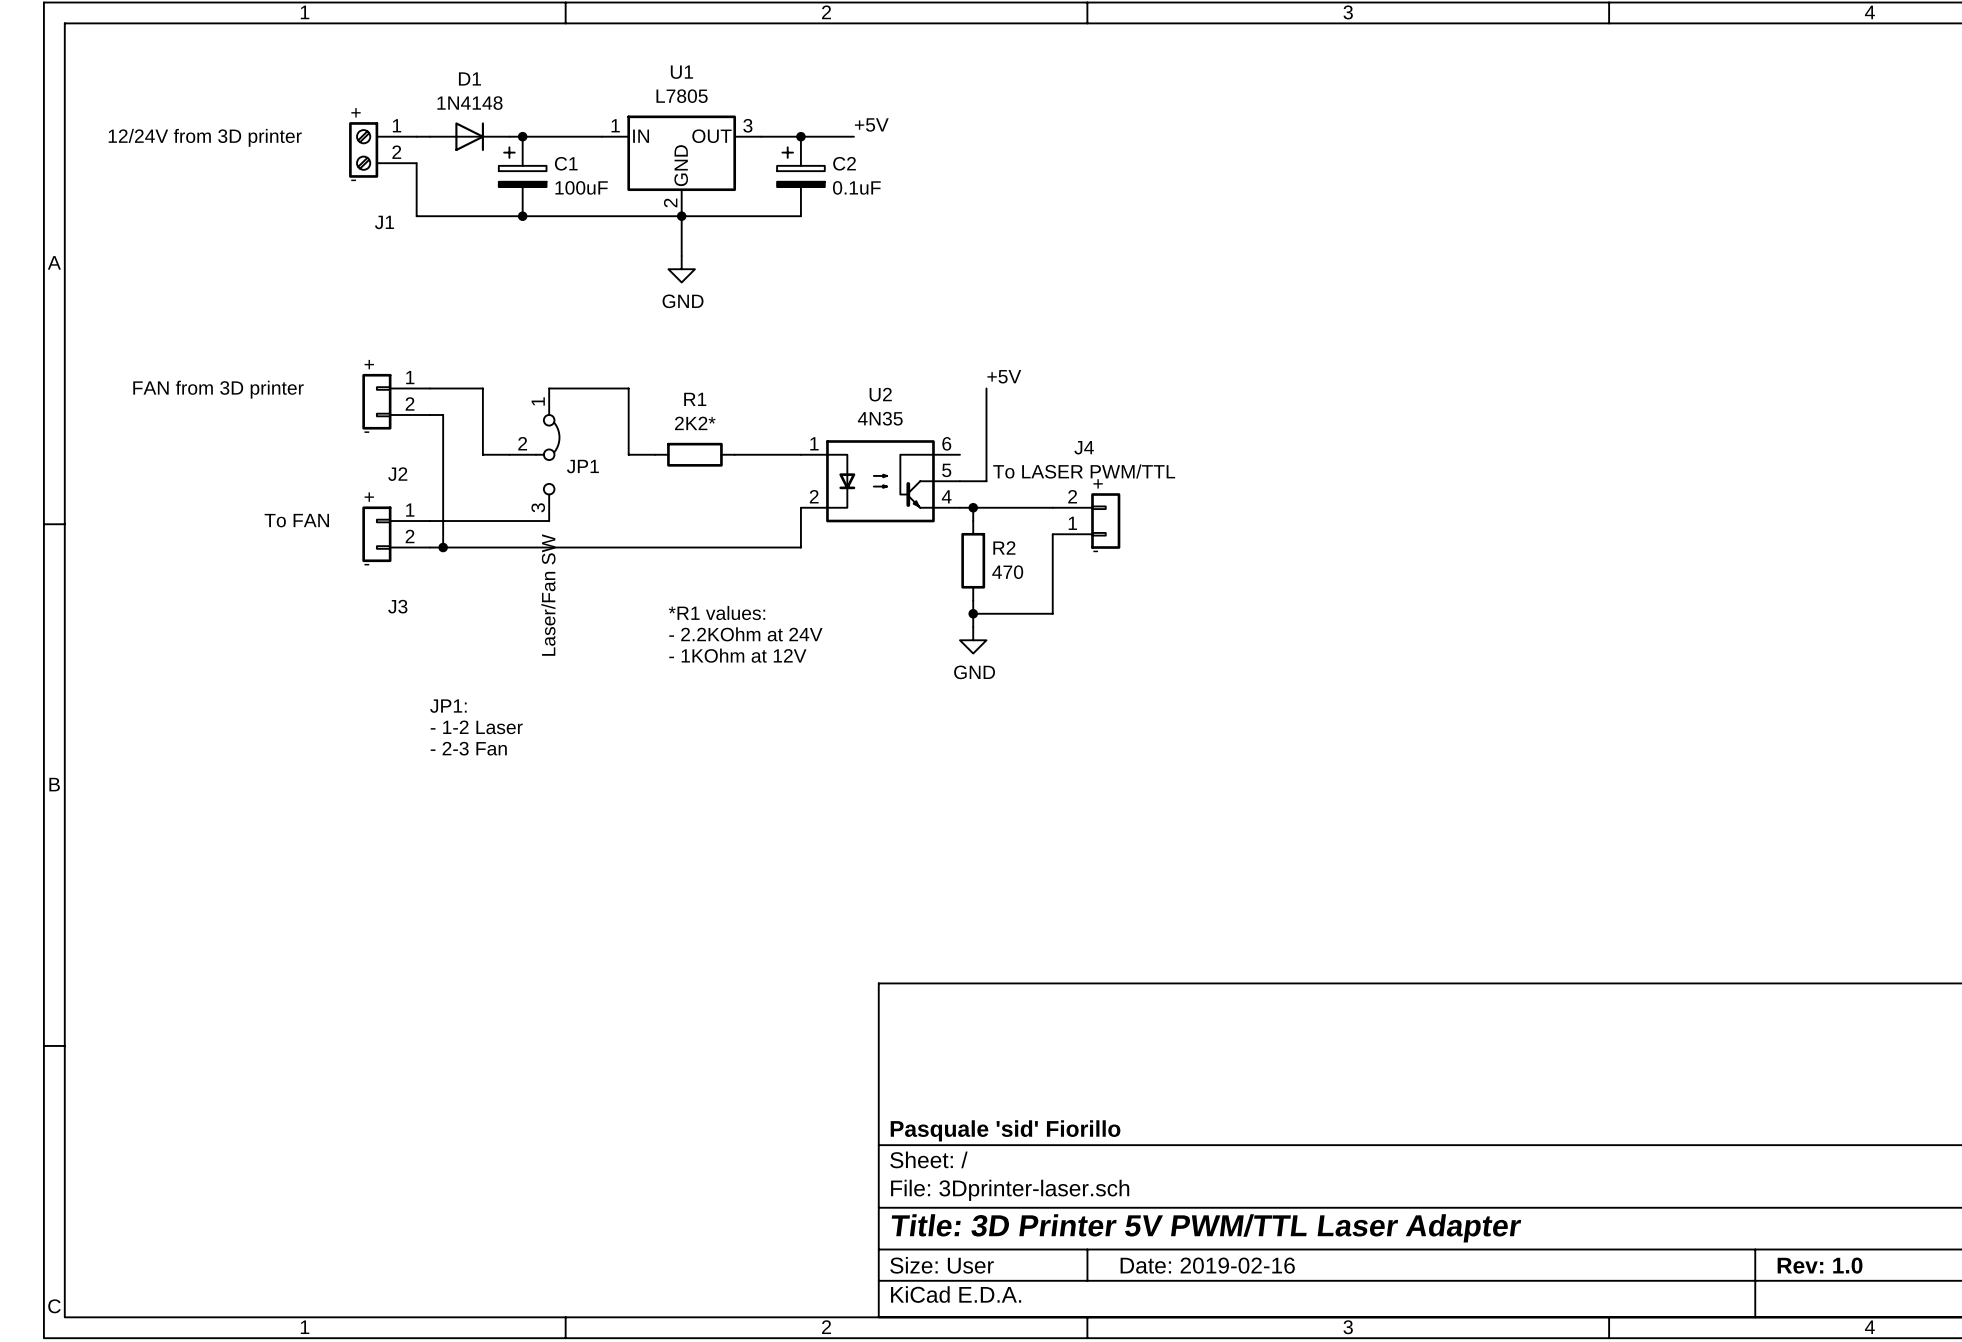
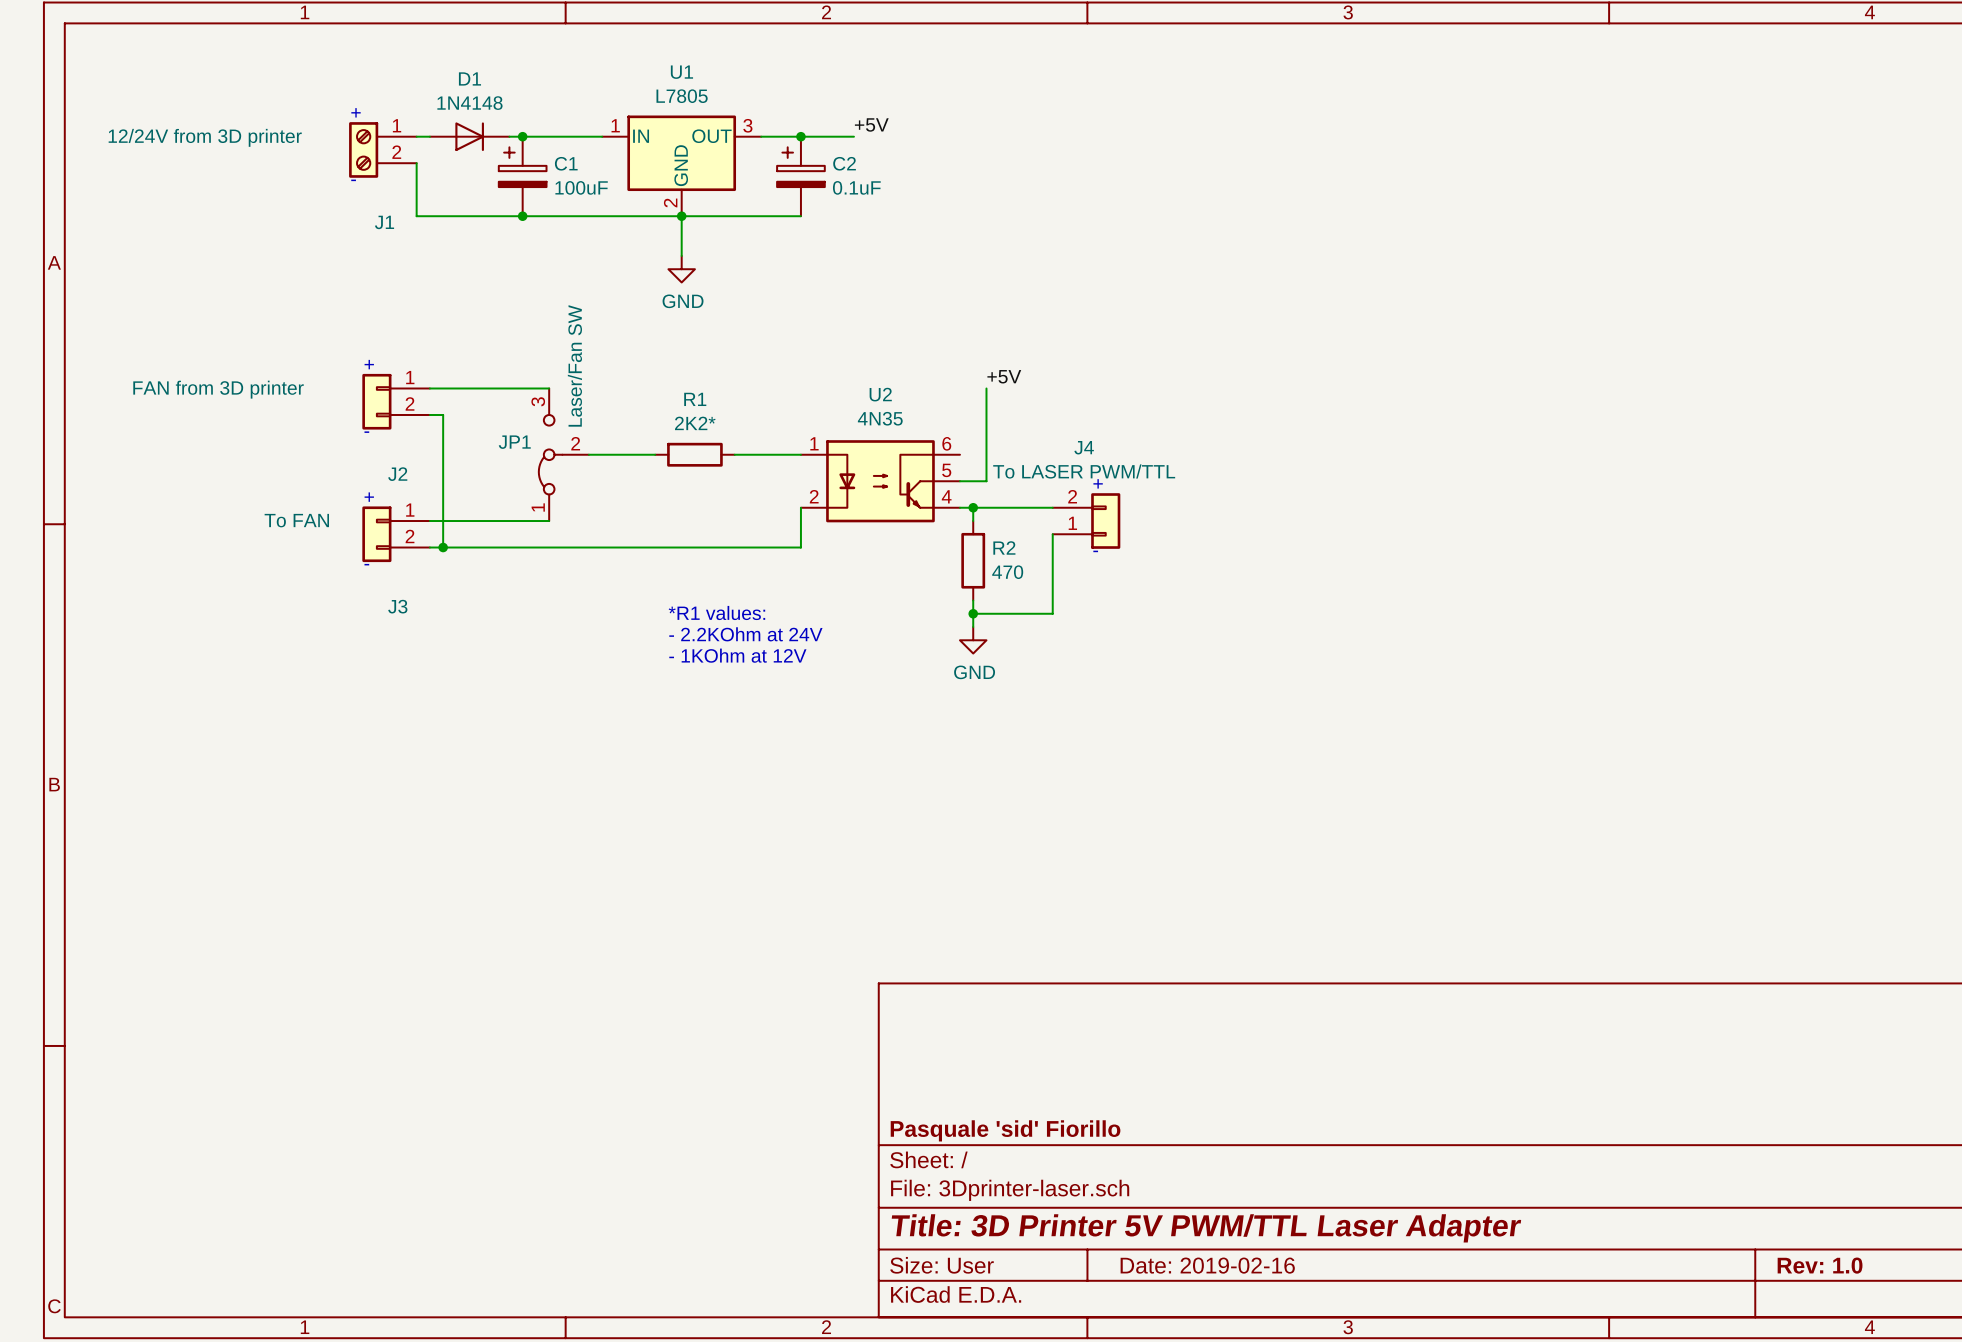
wire: (482, 388) (482, 454) (509, 454) -> (482, 388) (549, 388)
wire: (549, 388) (628, 388) (628, 454) -> (588, 454) (628, 454)
JP1 rotation: 0° (547, 454) -> 180° (550, 454)
JP1 value position: Laser/Fan SW (548, 595) -> Laser/Fan SW (574, 365)
text: JP1: (448, 706) -> none
text: - 1-2 Laser (476, 727) -> none
text: - 2-3 Fan (468, 748) -> none

